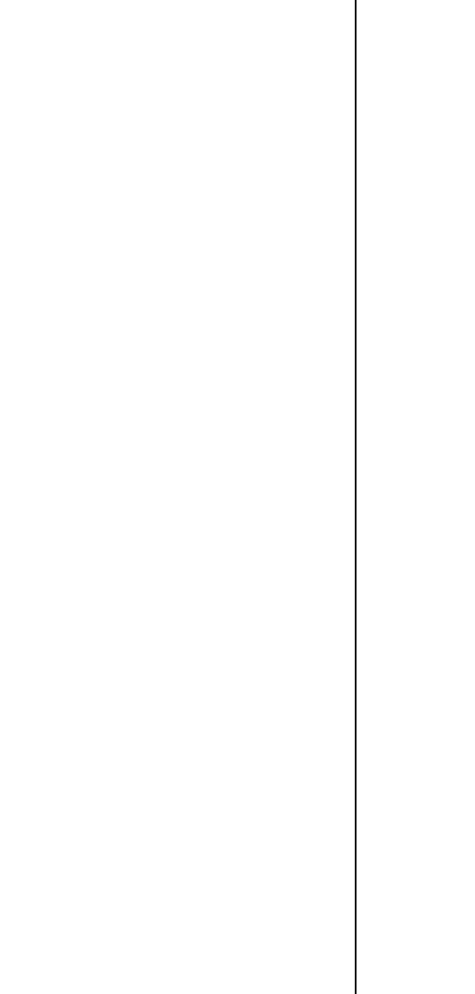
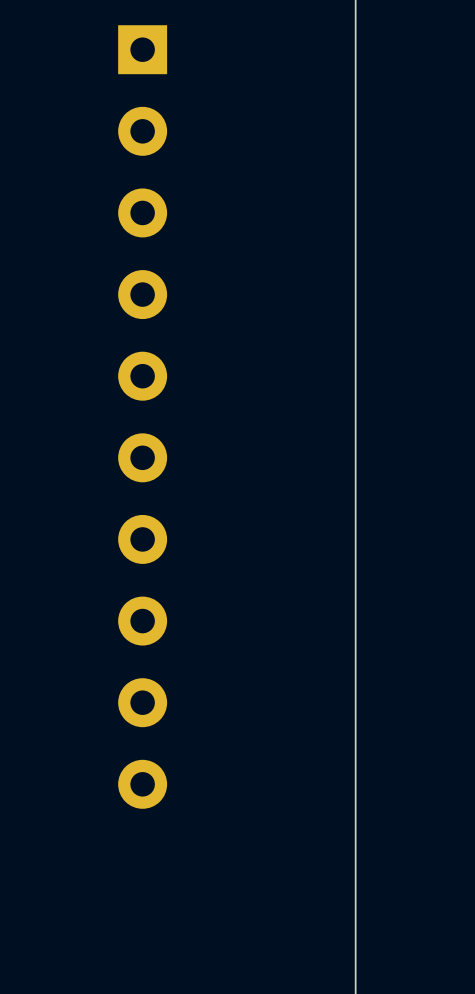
part: none -> (142, 417)

